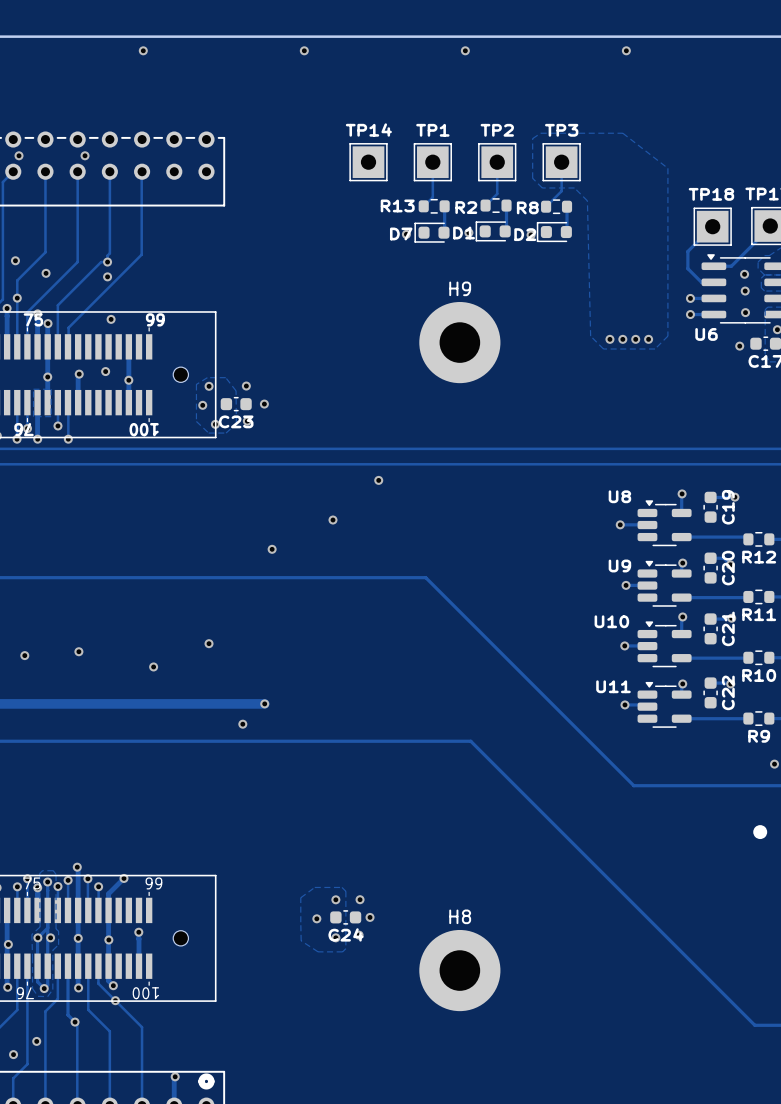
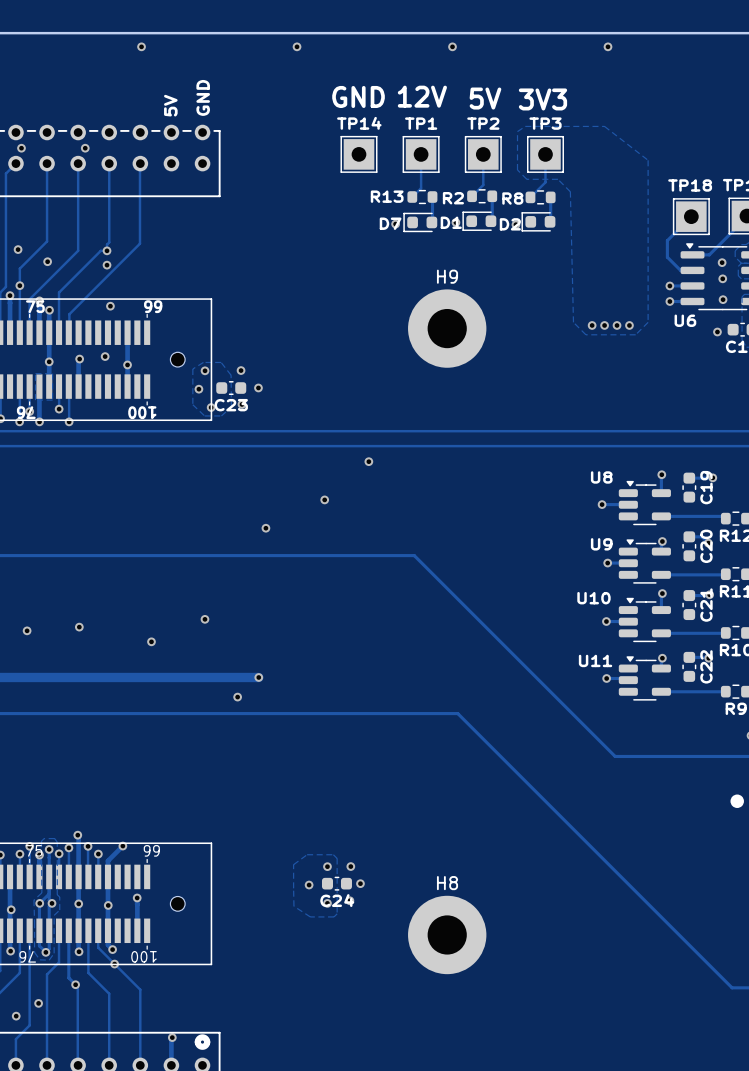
text: none -> GND (358, 96)
text: none -> 12V (422, 96)
text: none -> GND (203, 97)
text: none -> 5V (485, 98)
text: none -> 3V3 (542, 99)
text: none -> 5V (170, 105)

